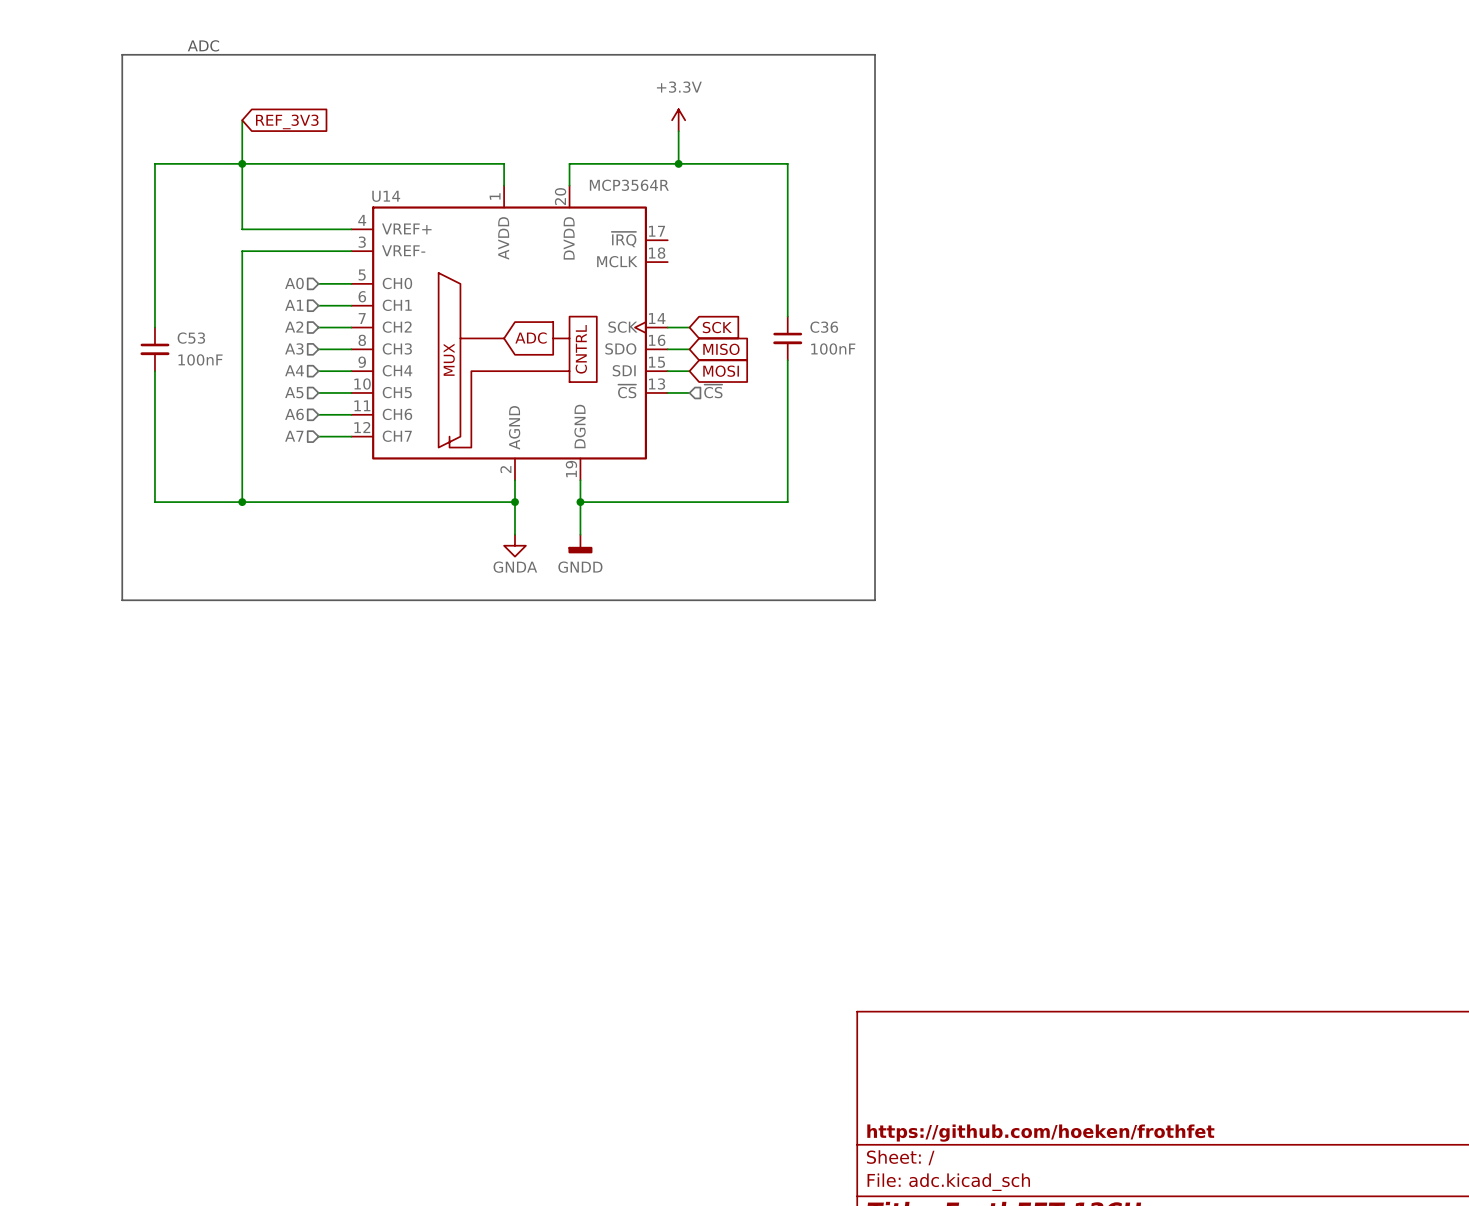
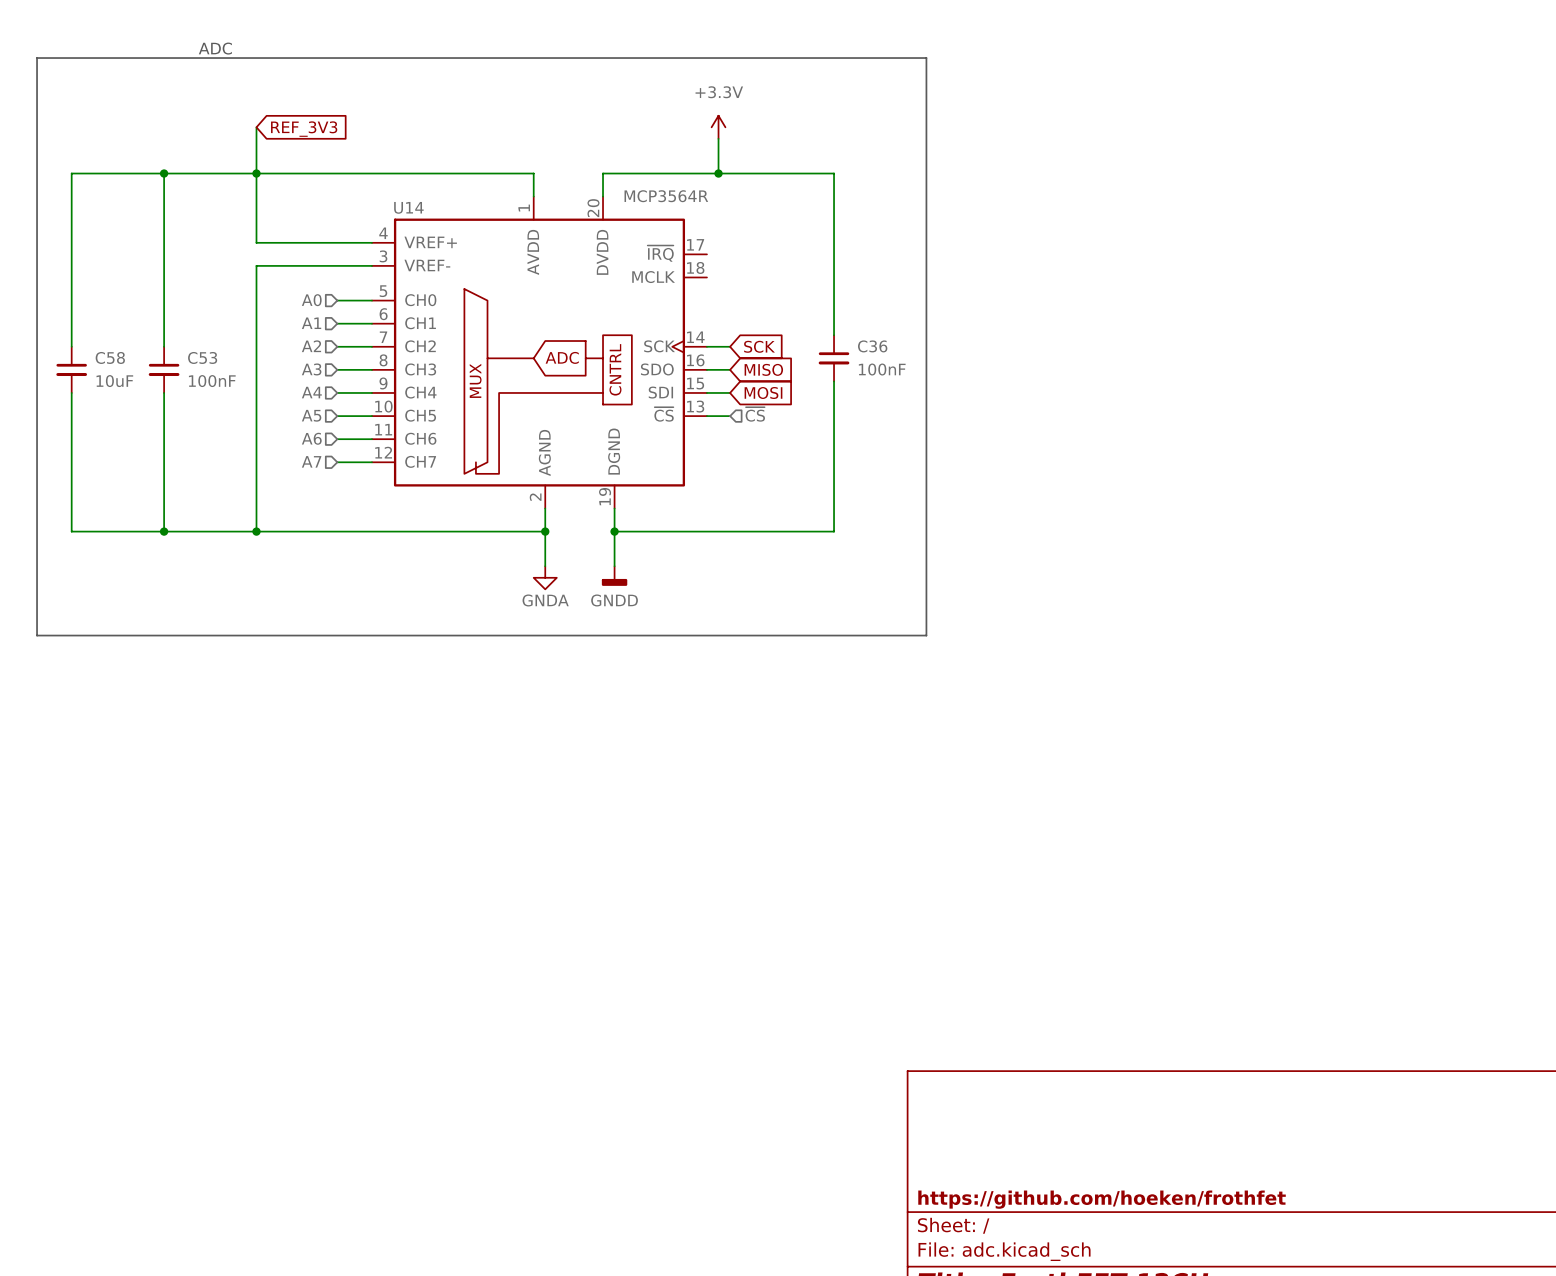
line: (122, 54) (122, 600) -> (129, 58) (37, 58) (37, 635) (129, 635)
wire: none -> (164, 173) (71, 173) (71, 346)
junction: none -> (164, 173)
C58: none -> 10uF (71, 369)
wire: none -> (71, 392) (71, 531) (164, 531)
junction: none -> (164, 531)

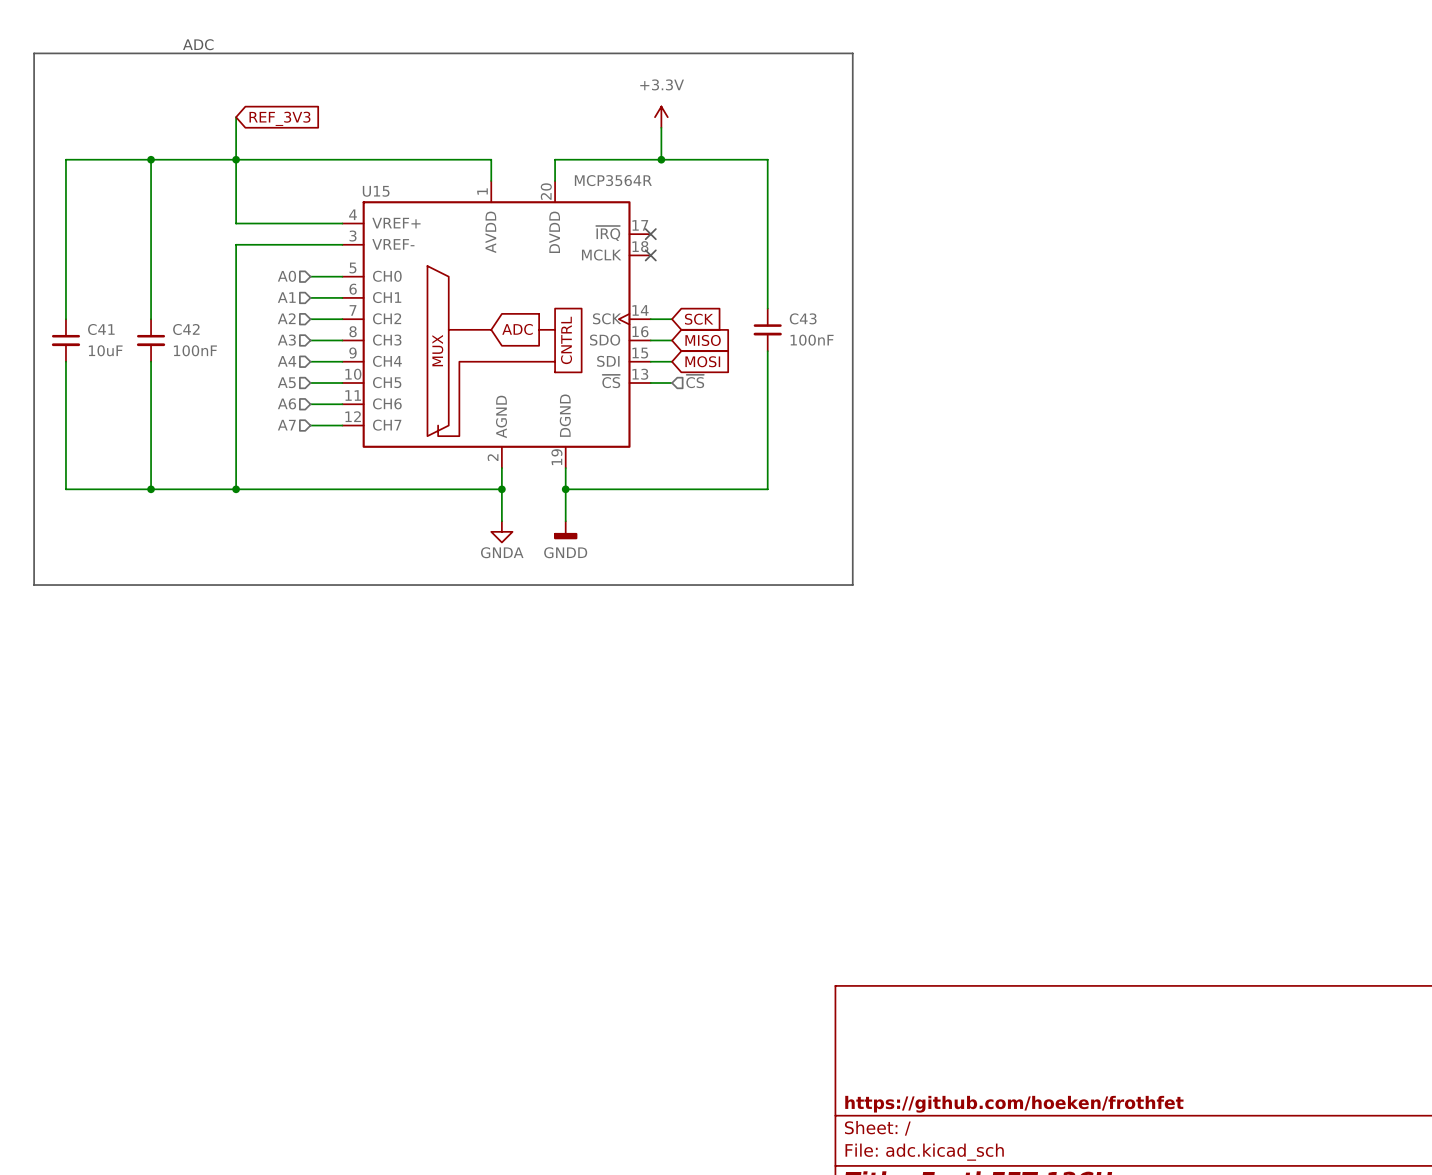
U14 name: U14 (408, 207) -> U15 (376, 191)
no-connect mark: none -> (650, 234)
no-connect mark: none -> (650, 255)
C36 name: C36 (872, 346) -> C43 (803, 318)
C58 name: C58 (110, 357) -> C41 (101, 329)
C53 name: C53 (202, 357) -> C42 (186, 329)

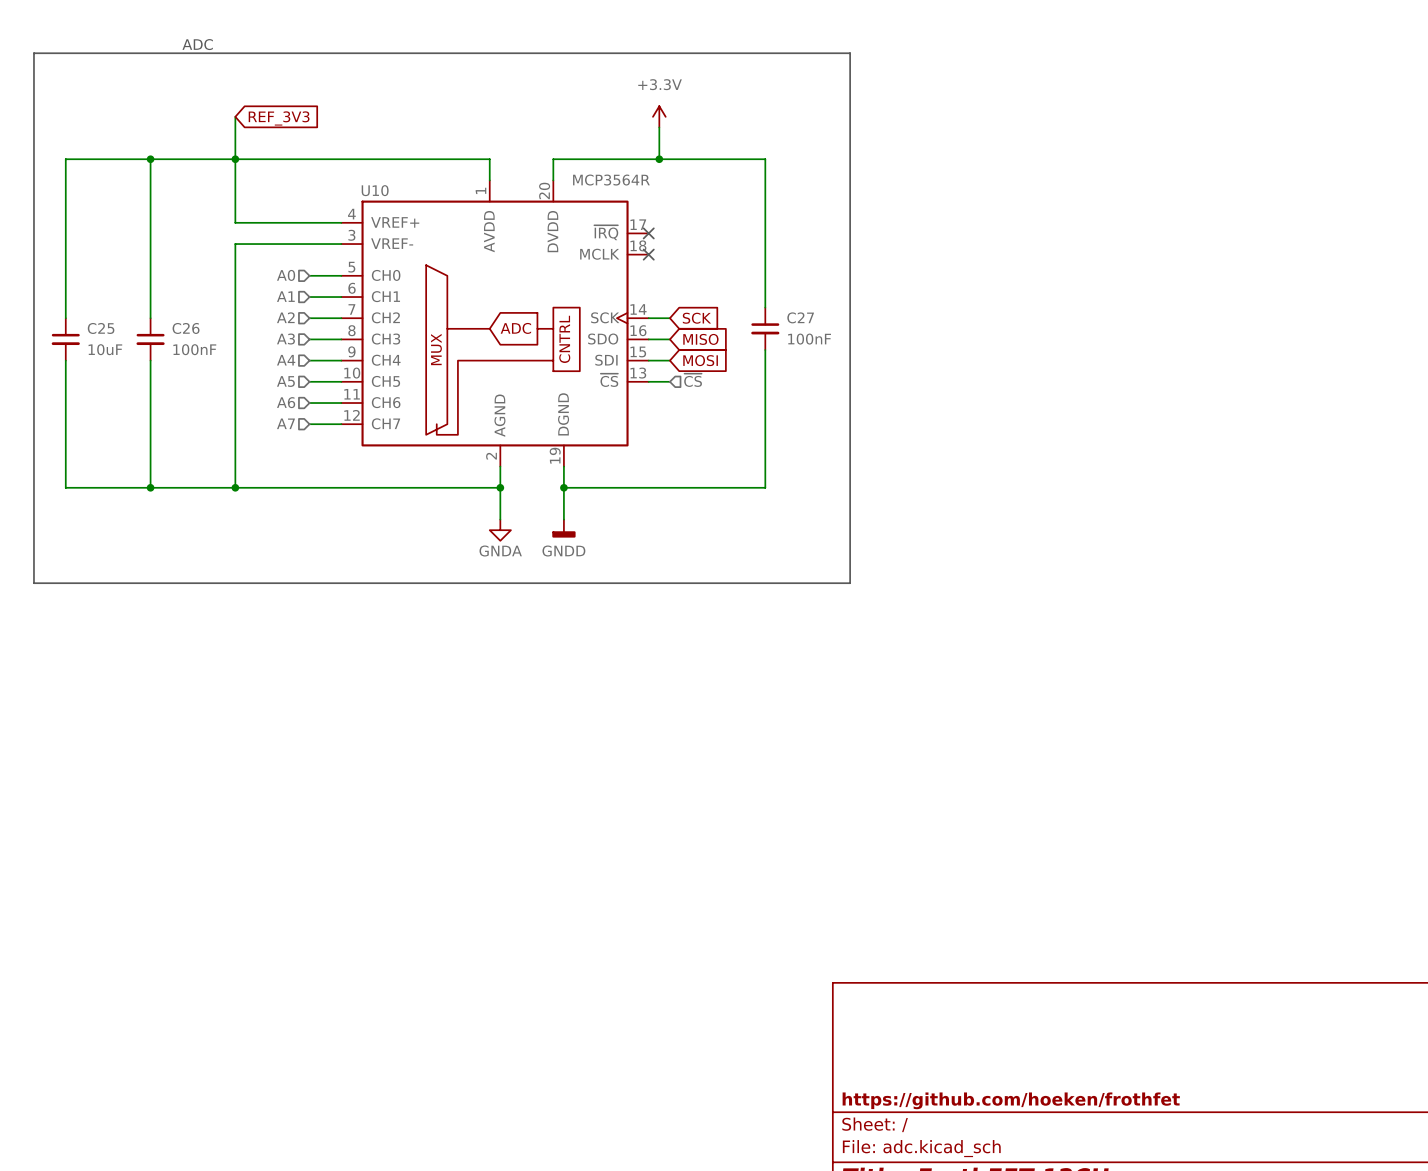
U15 name: U15 (376, 191) -> U10 (375, 190)
C43 name: C43 (803, 318) -> C27 (800, 317)
C41 name: C41 (101, 329) -> C25 (101, 328)
C42 name: C42 (186, 329) -> C26 (186, 328)

